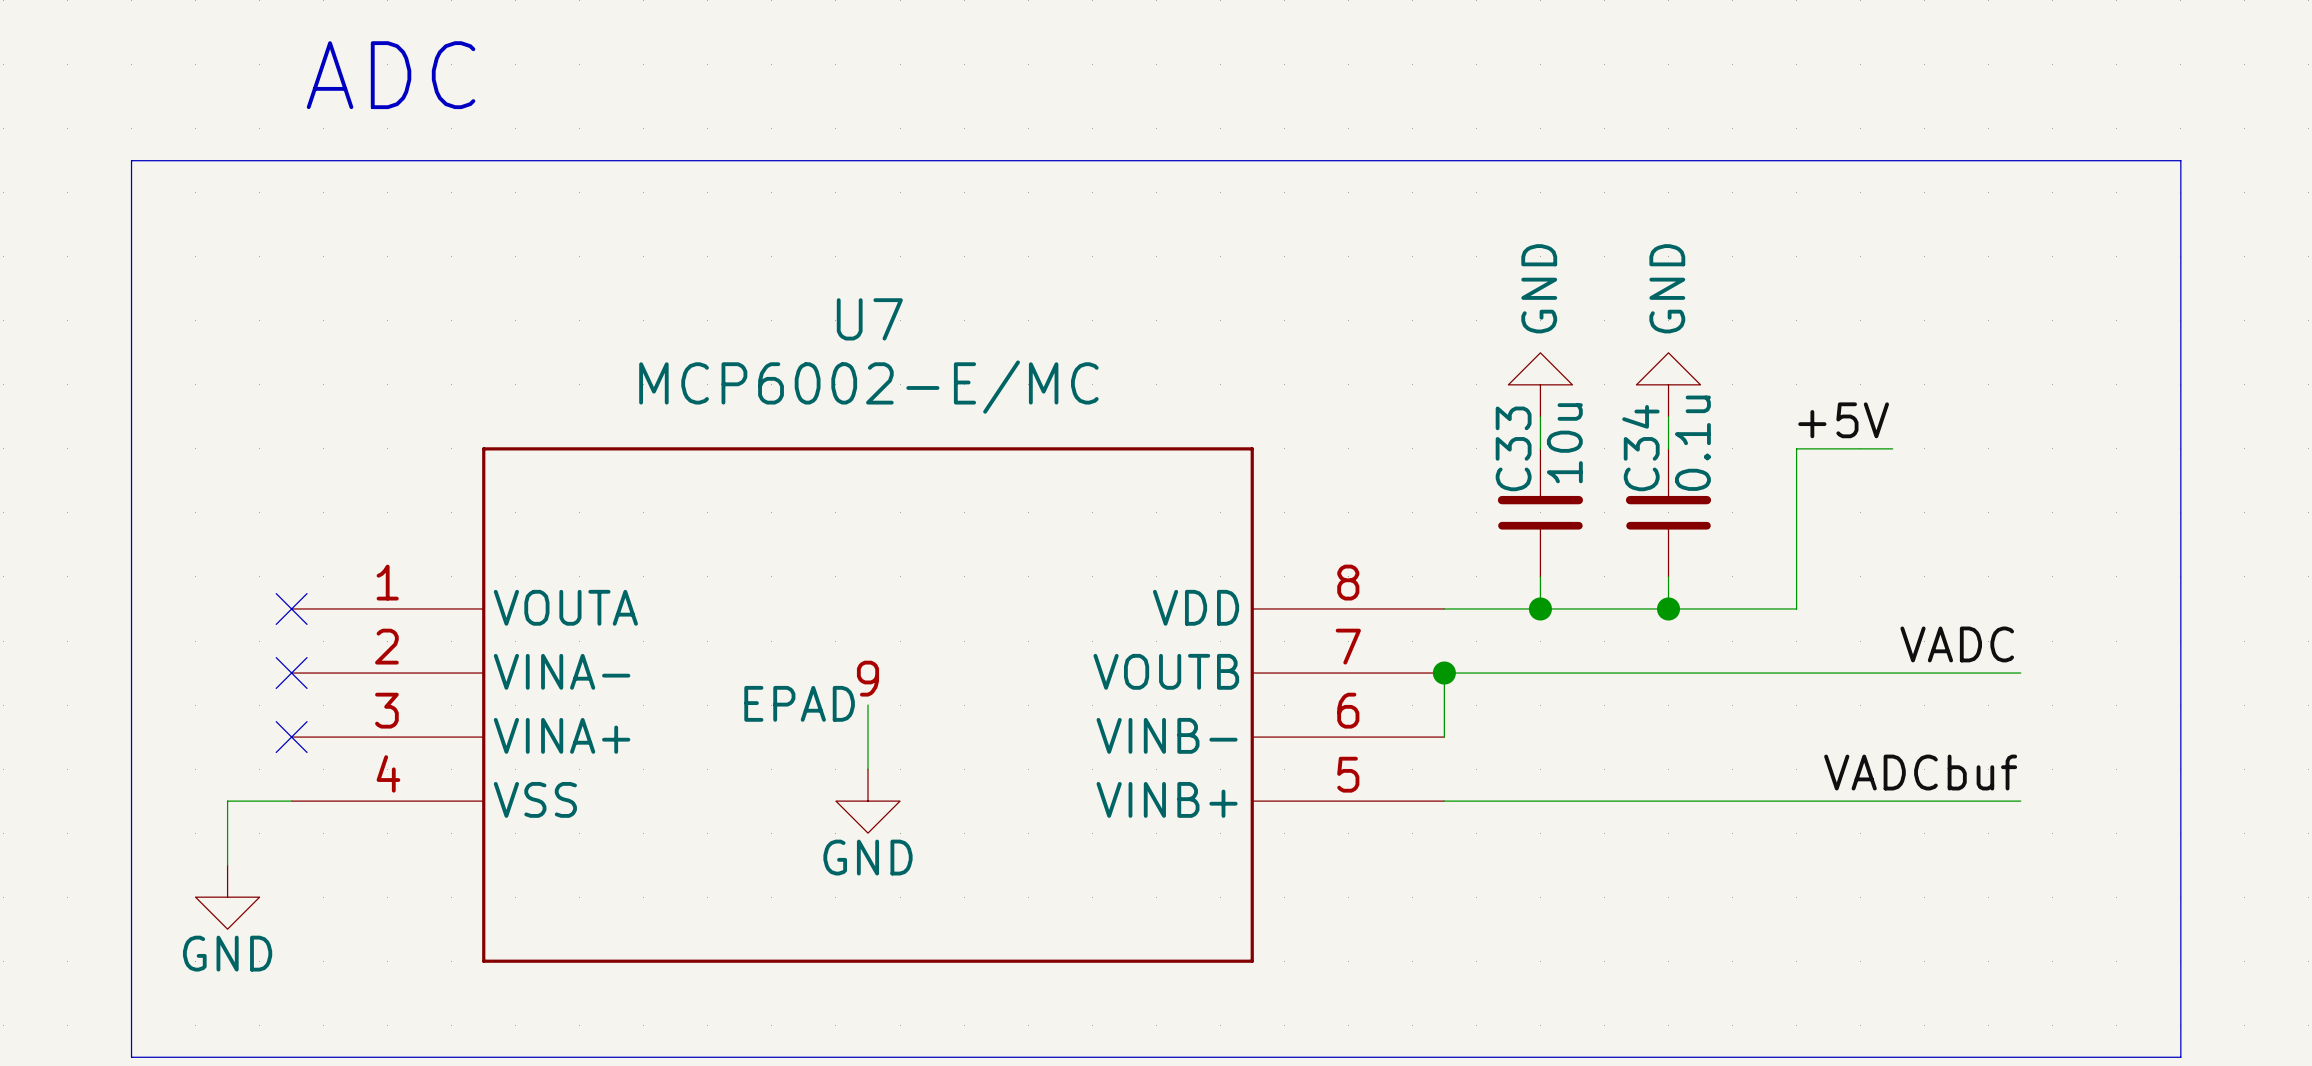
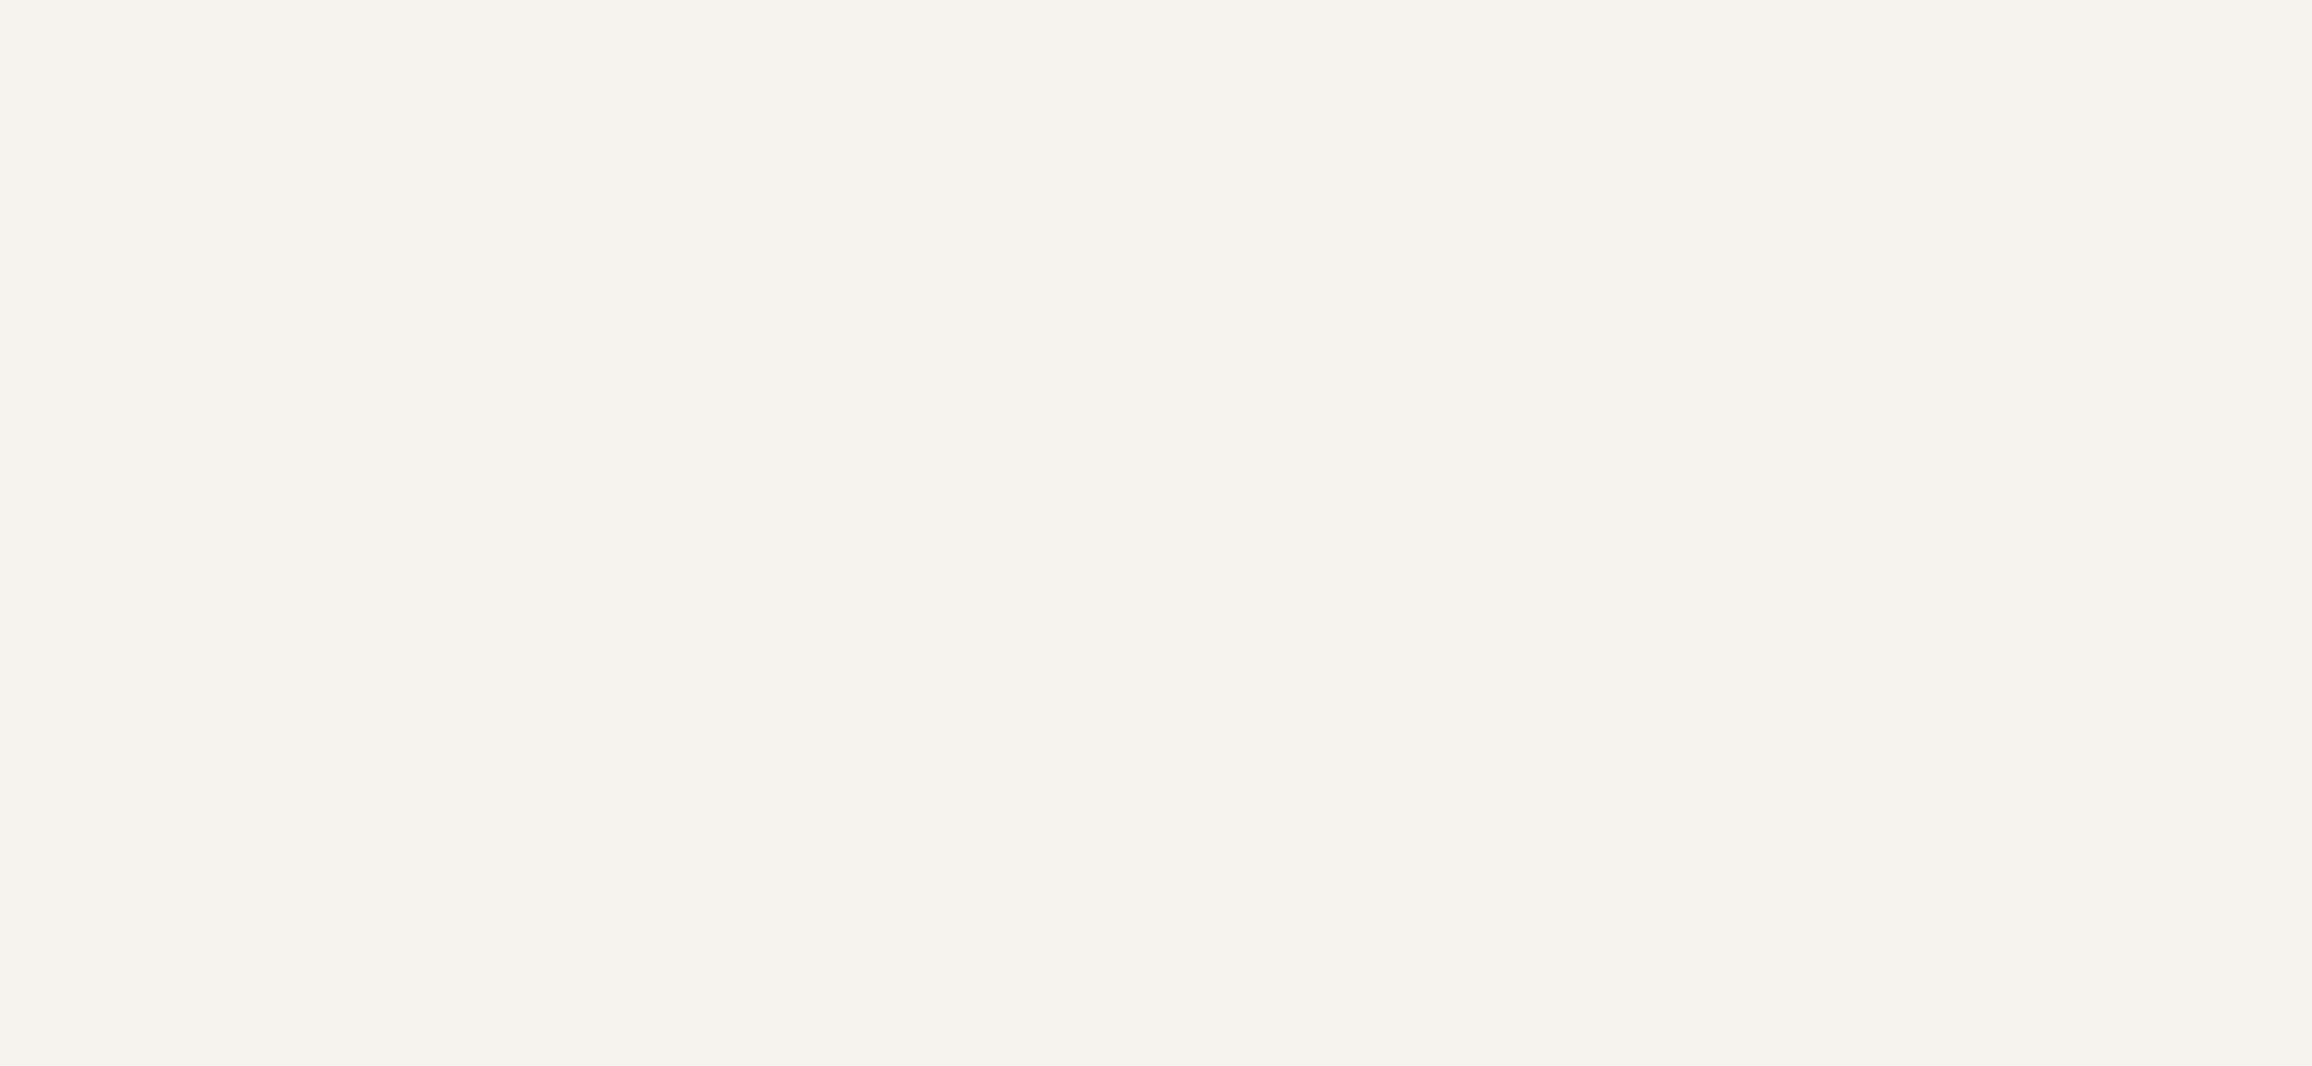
text: ADC (391, 75) -> none
line: (131, 160) (2180, 160) (2180, 1057) (131, 1057) (131, 160) -> none
power symbol: GND (1540, 384) -> none
power symbol: GND (1668, 384) -> none
wire: (1540, 416) (1540, 448) -> none
wire: (1668, 416) (1668, 448) -> none
label: +5V (1843, 420) -> none
wire: (1892, 448) (1796, 448) (1796, 608) (1444, 608) -> none
C33: 10u (1540, 512) -> none
C34: 0.1u (1668, 512) -> none
wire: (1540, 576) (1540, 608) -> none
wire: (1668, 576) (1668, 608) -> none
no-connect mark: (291, 608) -> none
junction: (1540, 608) -> none
junction: (1668, 608) -> none
label: VADC (1957, 644) -> none
no-connect mark: (291, 673) -> none
junction: (1444, 673) -> none
wire: (2020, 673) (1444, 673) (1444, 737) -> none
wire: (867, 705) (867, 769) -> none
U7: MCP6002-E/MC (867, 705) -> none
no-connect mark: (291, 737) -> none
label: VADCbuf (1920, 772) -> none
wire: (291, 801) (227, 801) (227, 865) -> none
power symbol: GND (867, 801) -> none
wire: (1444, 801) (2020, 801) -> none
power symbol: GND (227, 897) -> none

